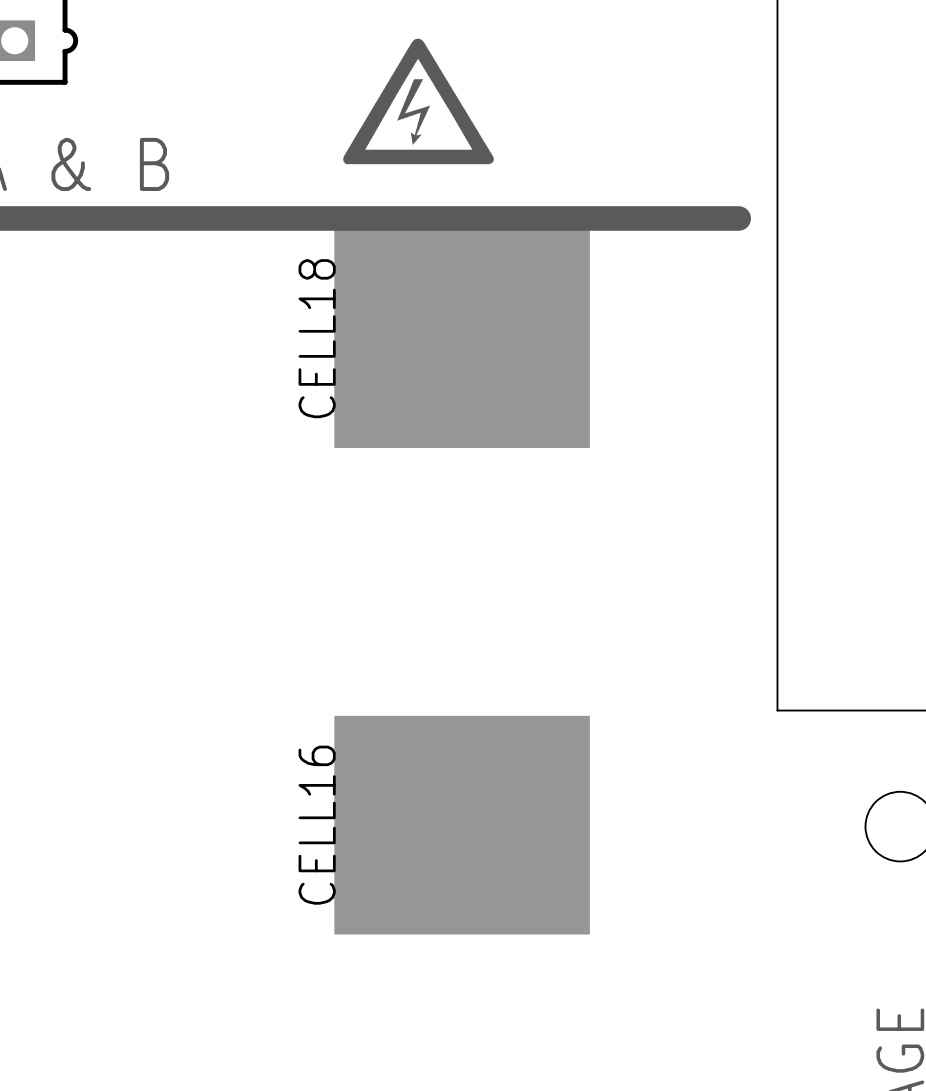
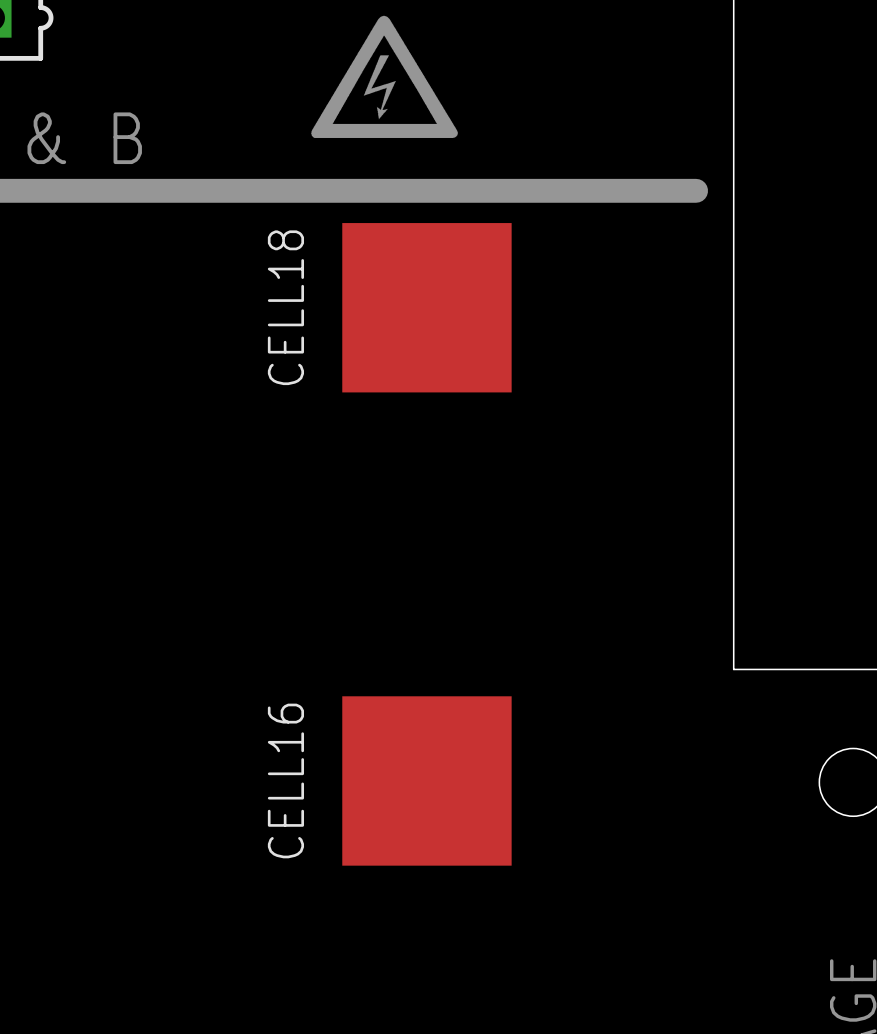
CELL18 footprint: [334, 229, 590, 449] -> [342, 223, 512, 393]
CELL16 footprint: [334, 715, 590, 935] -> [342, 696, 512, 866]

